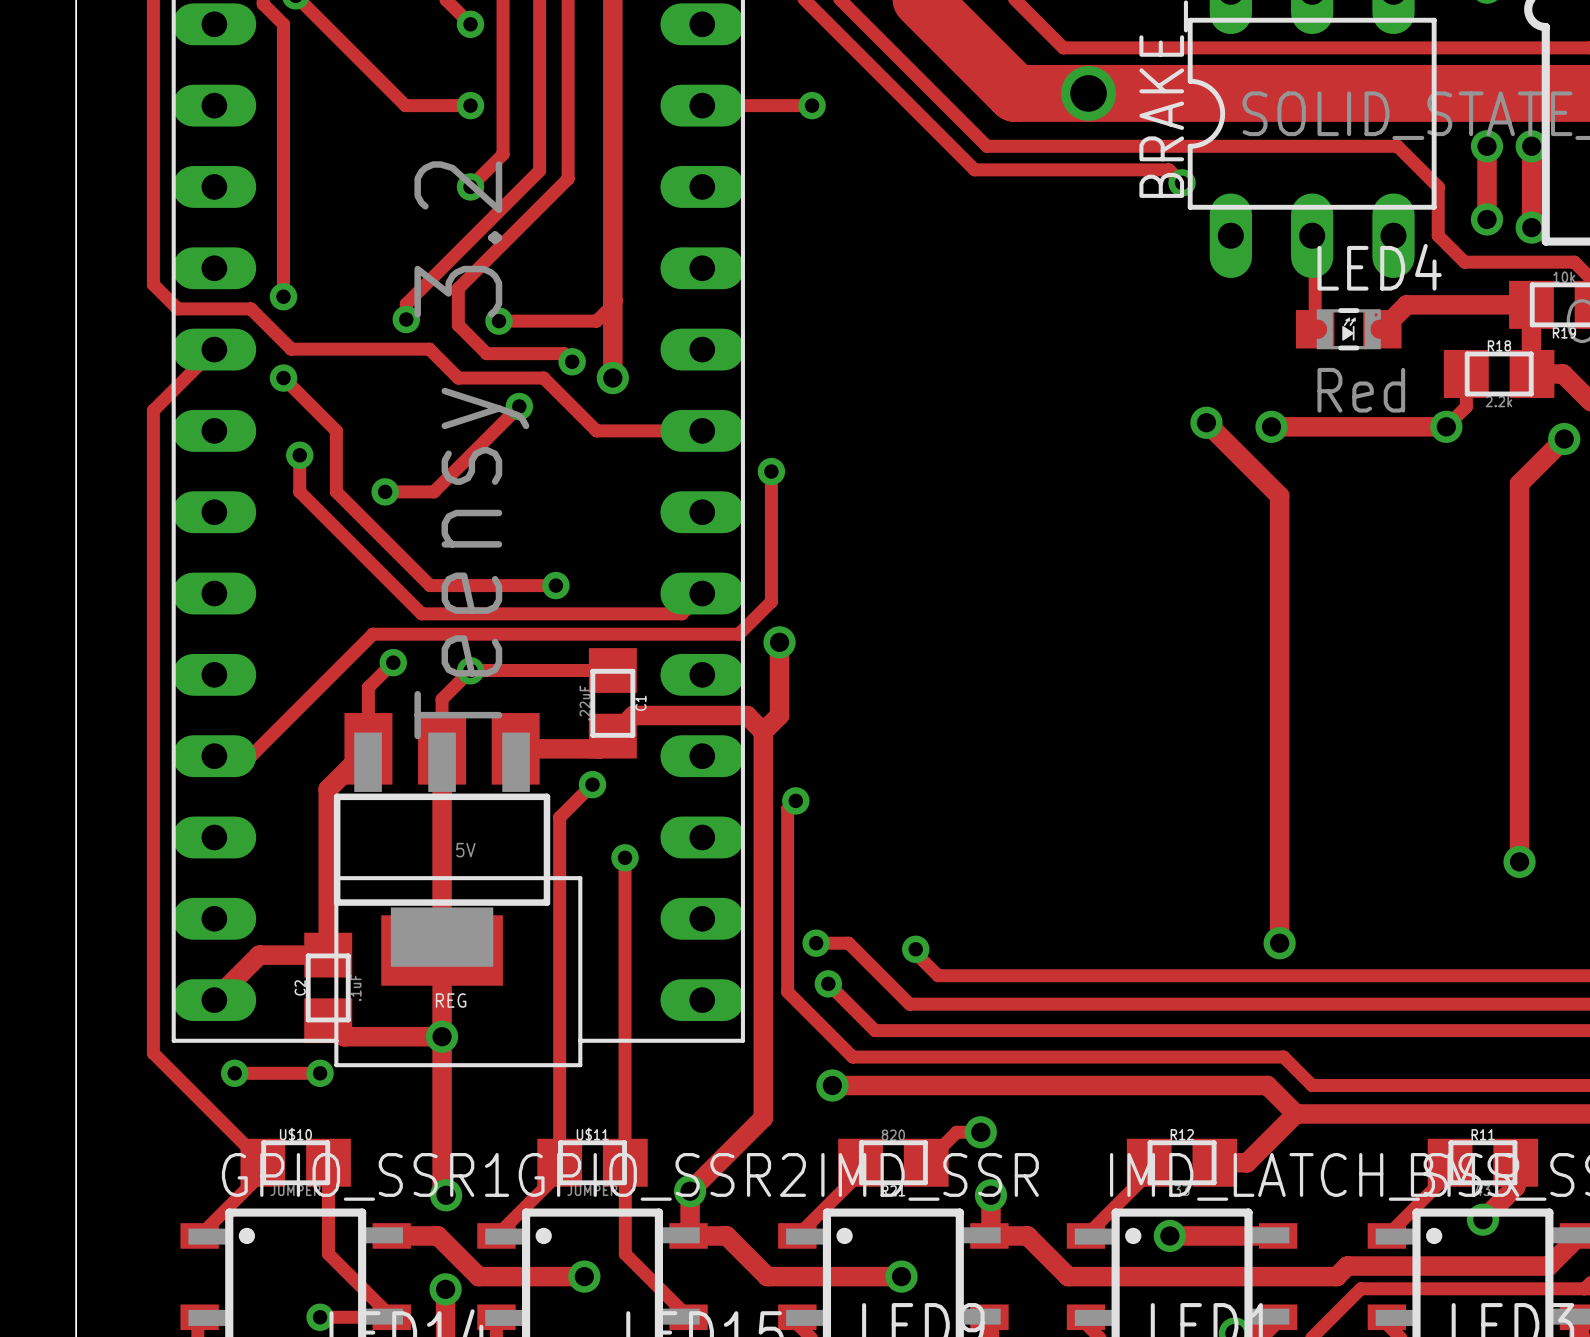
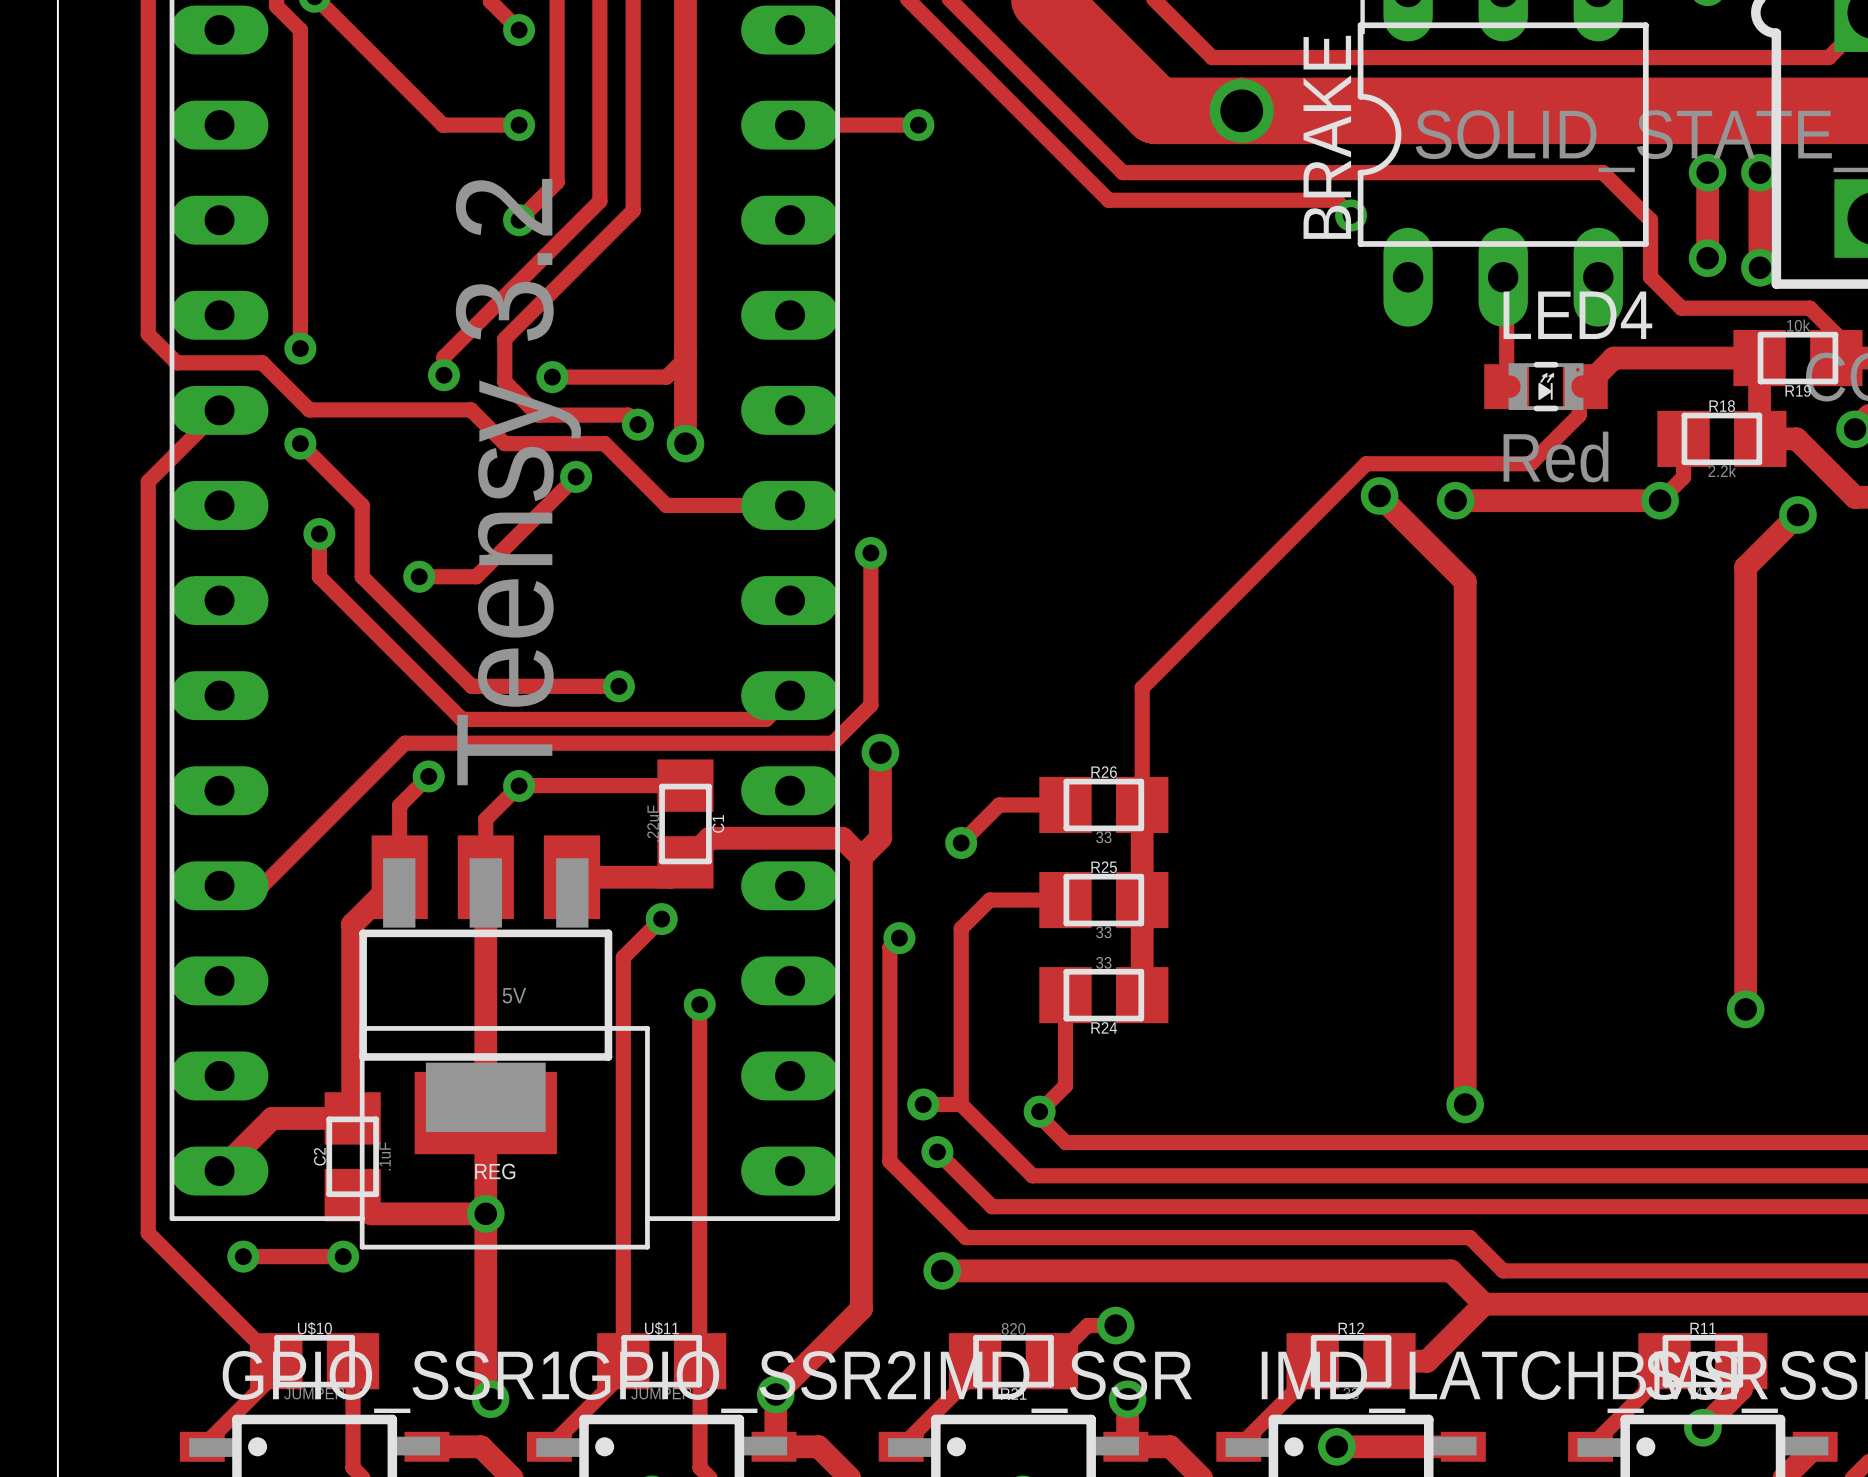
track: none -> (1585, 386) (1579, 392) (1579, 415) (1530, 463) (1366, 463) (1142, 687) (1142, 995) (1142, 804)
track: none -> (1065, 804) (999, 804) (961, 843)
R26: none -> 33 (1103, 804)
via: none -> (961, 843)
track: none -> (1065, 900) (989, 900) (961, 928) (961, 1104)
R25: none -> 33 (1103, 900)
track: none -> (1065, 995) (1065, 1085) (1039, 1111)
R24: none -> 33 (1103, 995)

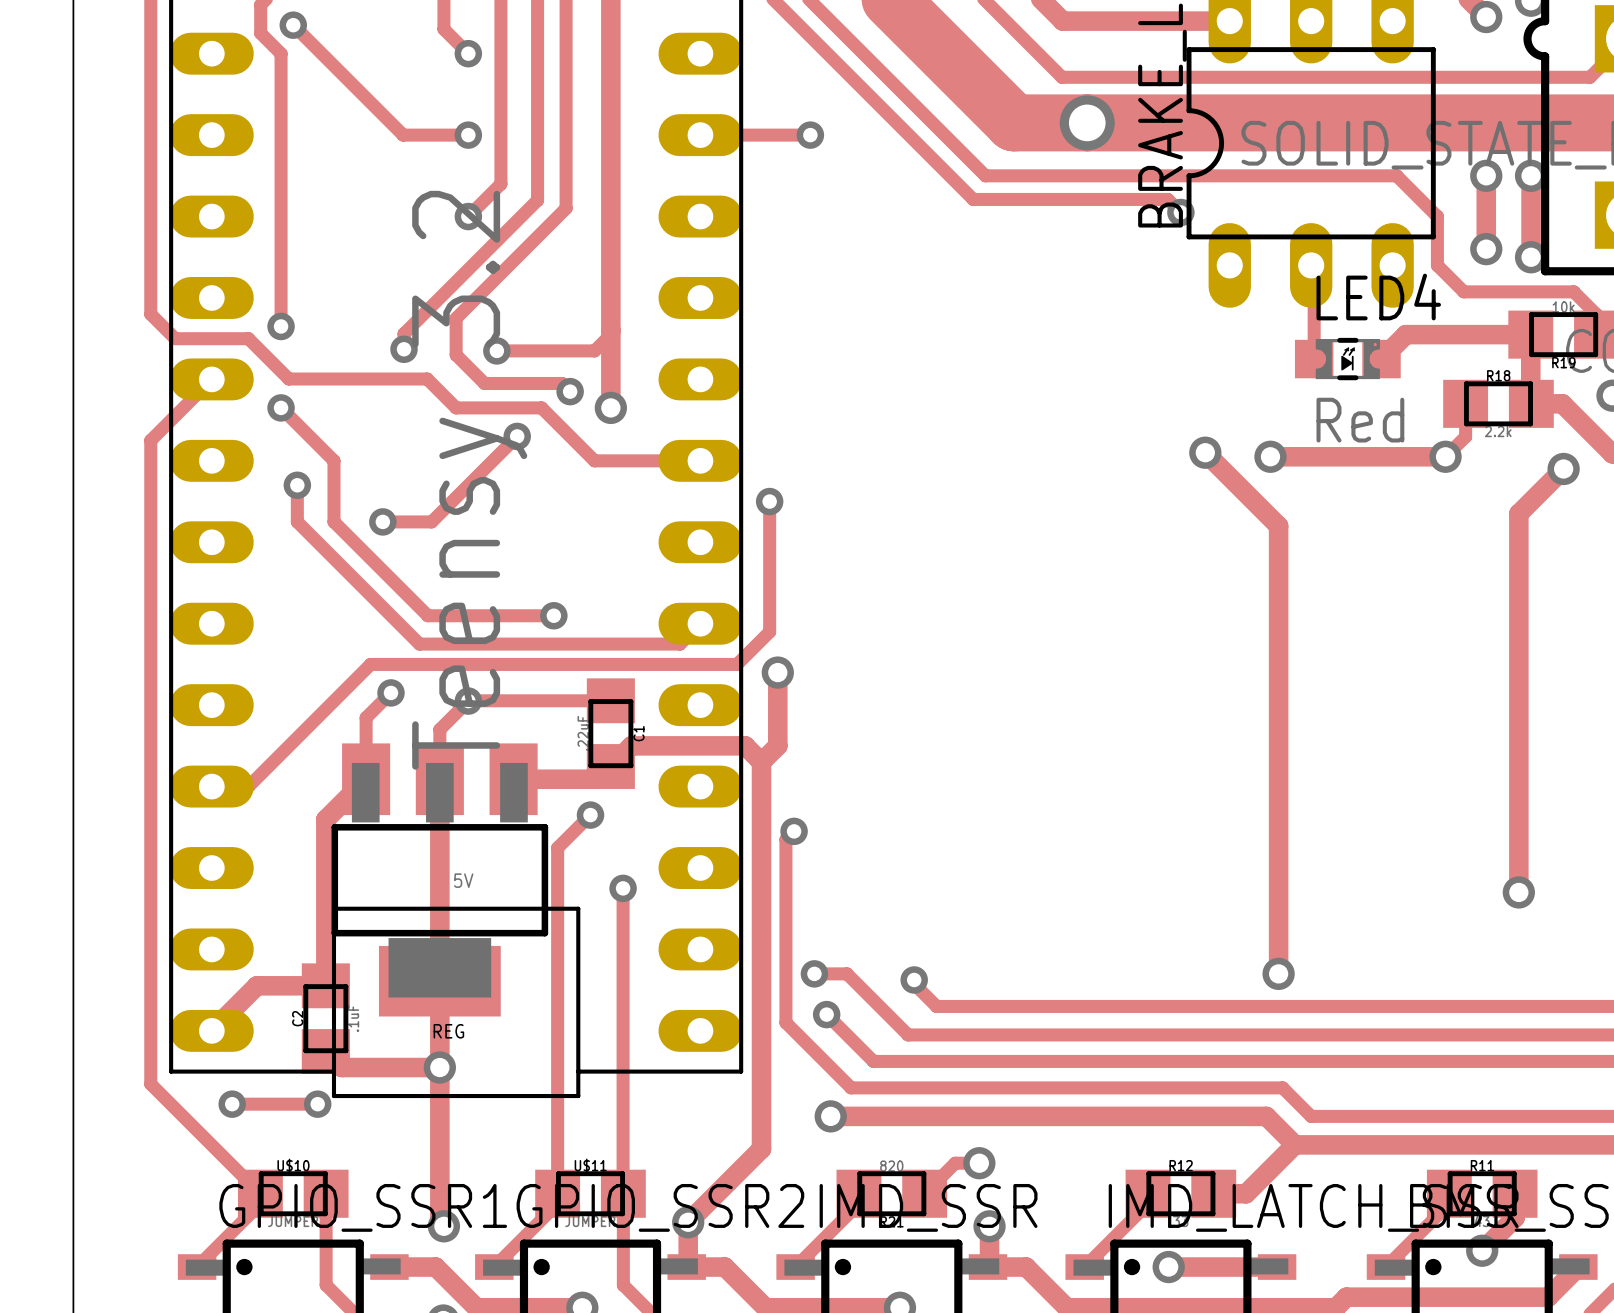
track: (1585, 386) (1579, 392) (1579, 415) (1530, 463) (1366, 463) (1142, 687) (1142, 995) (1142, 804) -> none
track: (1065, 804) (999, 804) (961, 843) -> none
R26: 33 (1103, 804) -> none
via: (961, 843) -> none
track: (1065, 900) (989, 900) (961, 928) (961, 1104) -> none
R25: 33 (1103, 900) -> none
track: (1065, 995) (1065, 1085) (1039, 1111) -> none
R24: 33 (1103, 995) -> none

